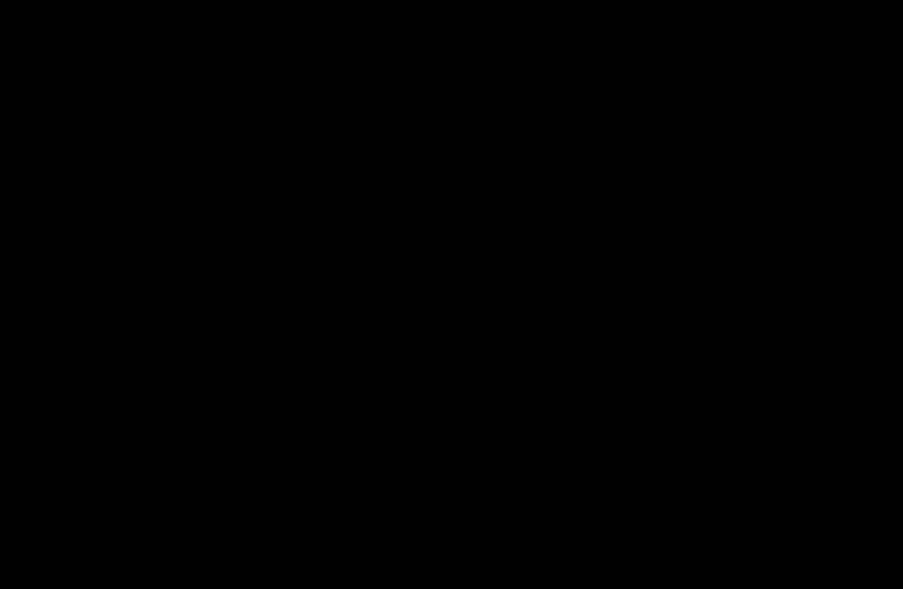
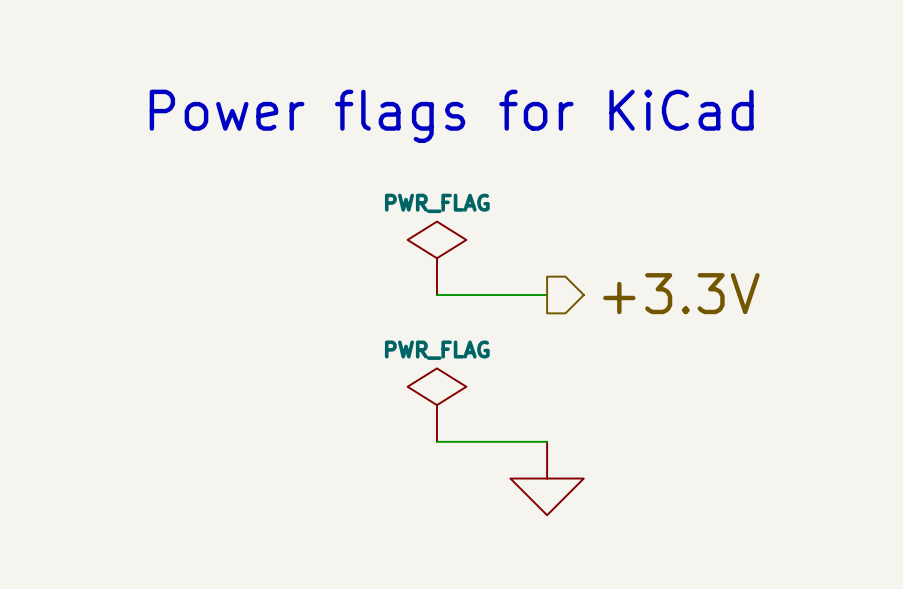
text: none -> Power flags for KiCad (451, 116)
power symbol: none -> PWR_FLAG (436, 258)
hierarchical label: none -> +3.3V (681, 293)
wire: none -> (436, 295) (547, 295)
power symbol: none -> PWR_FLAG (436, 405)
wire: none -> (436, 441) (547, 441)
power symbol: none -> (547, 478)

